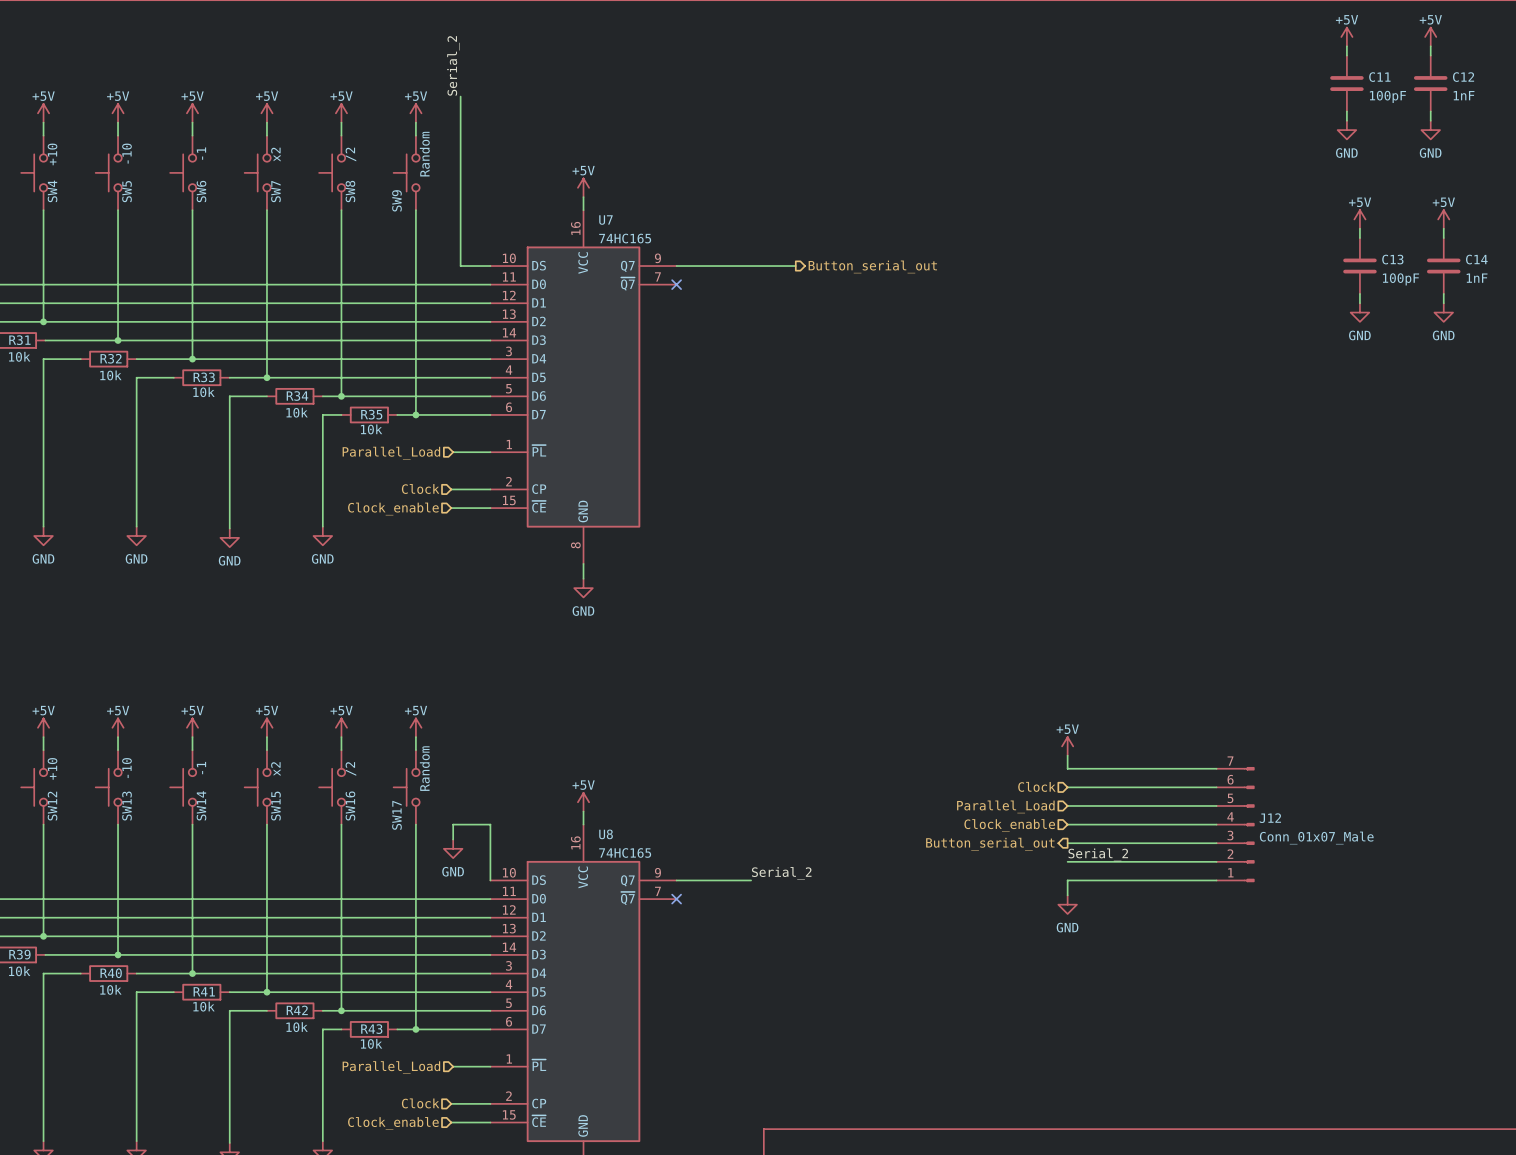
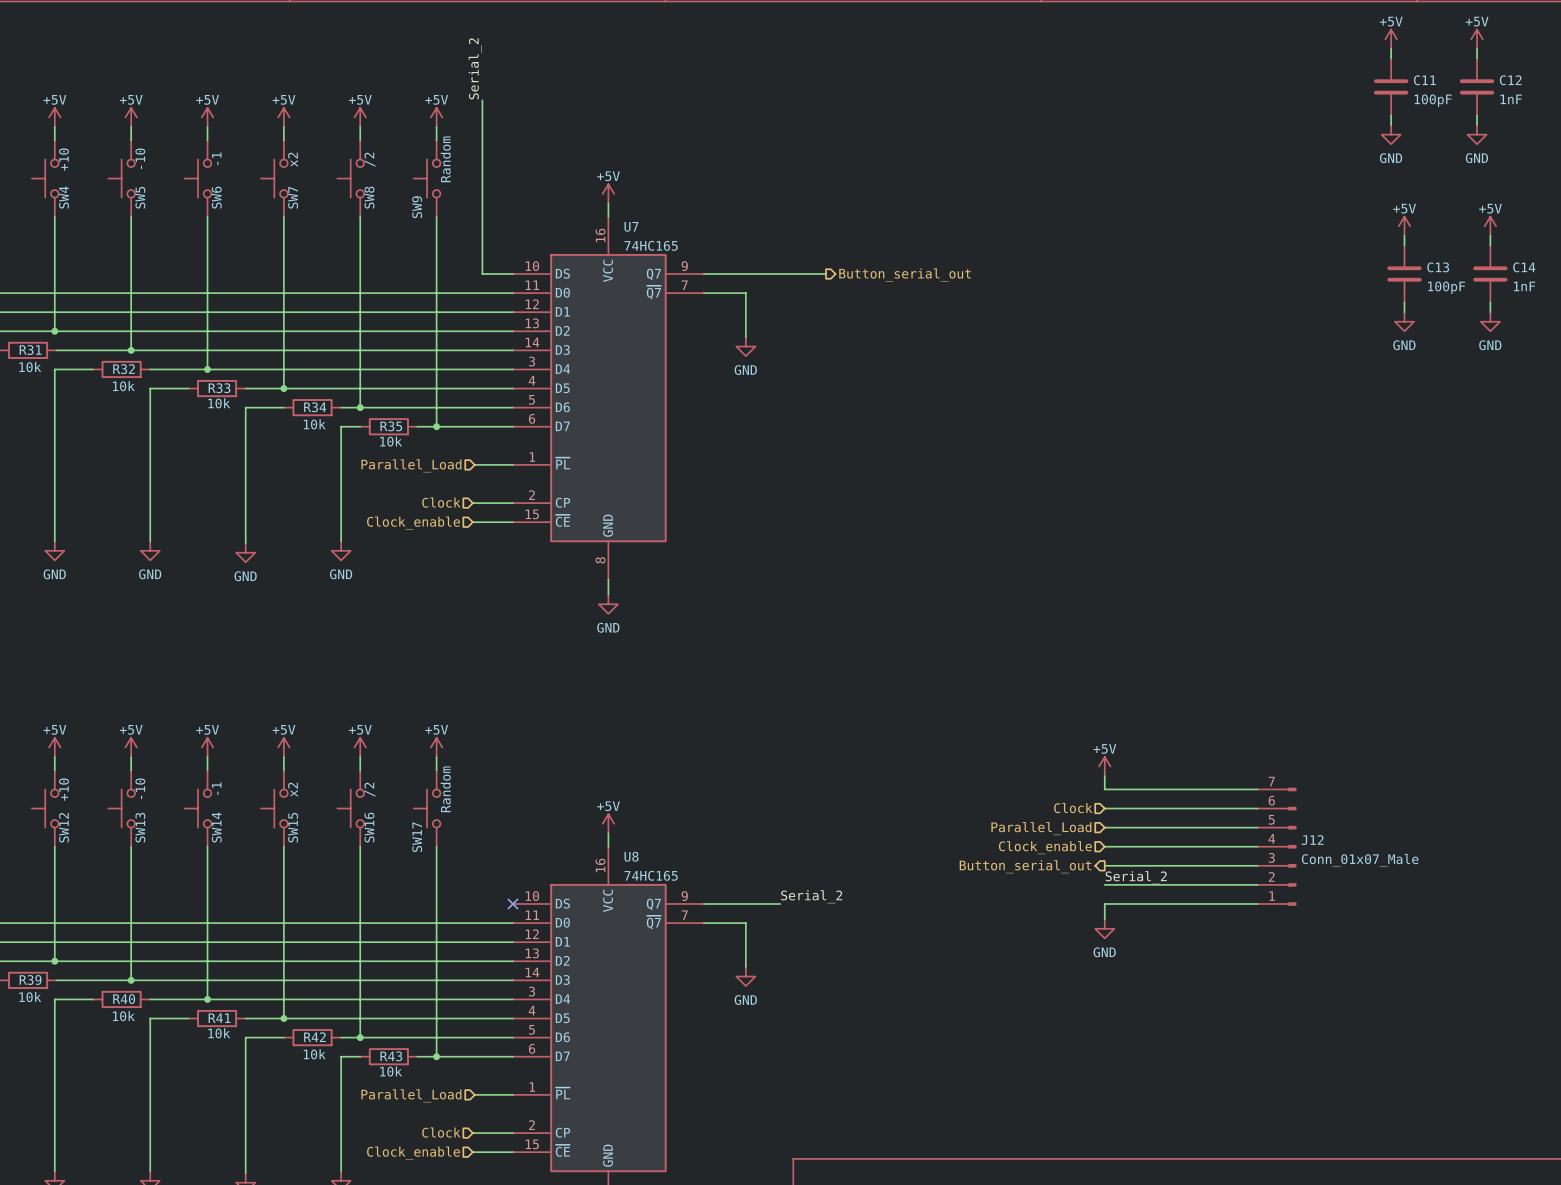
wire: none -> (703, 293) (745, 293) (745, 337)
no-connect mark: (676, 284) -> none
power symbol: none -> GND (745, 346)
wire: (453, 839) (453, 824) (490, 824) (490, 880) -> none
power symbol: GND (453, 848) -> none
no-connect mark: none -> (512, 903)
wire: none -> (703, 923) (745, 923) (745, 966)
no-connect mark: (676, 899) -> none
power symbol: none -> GND (745, 976)

